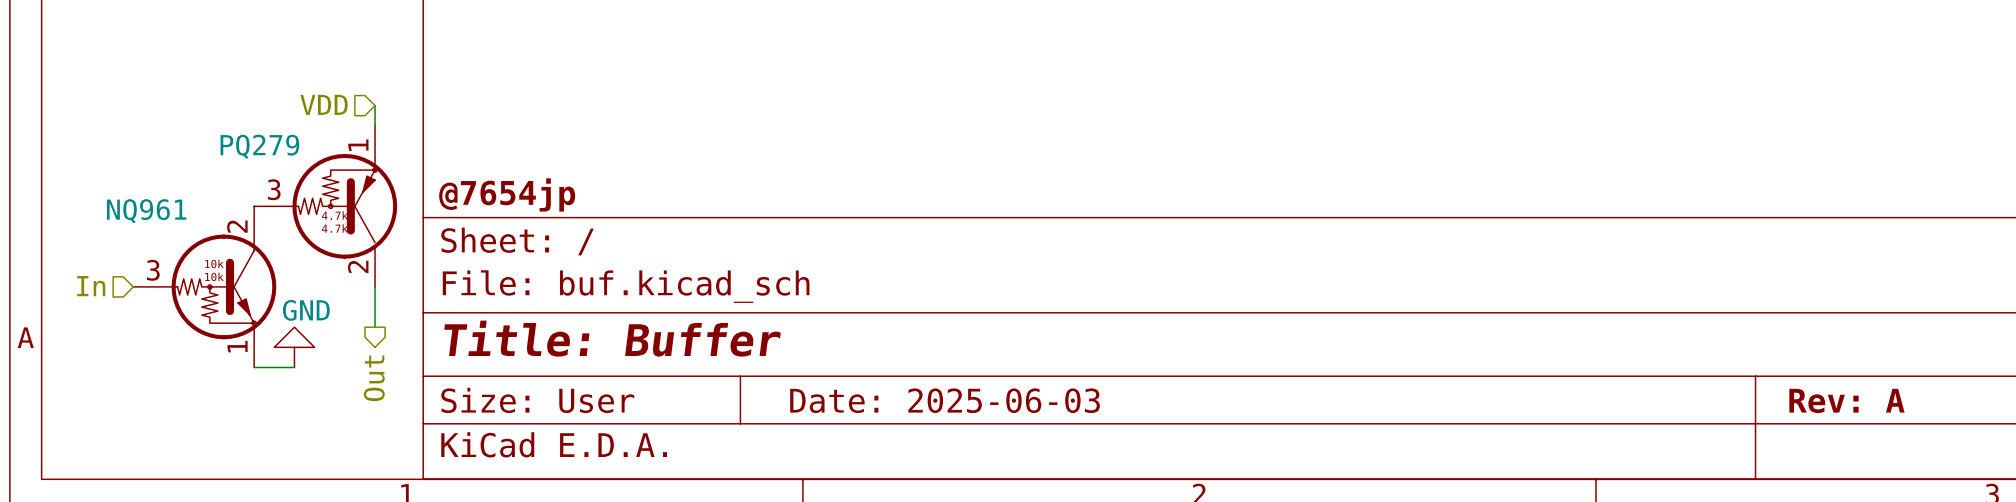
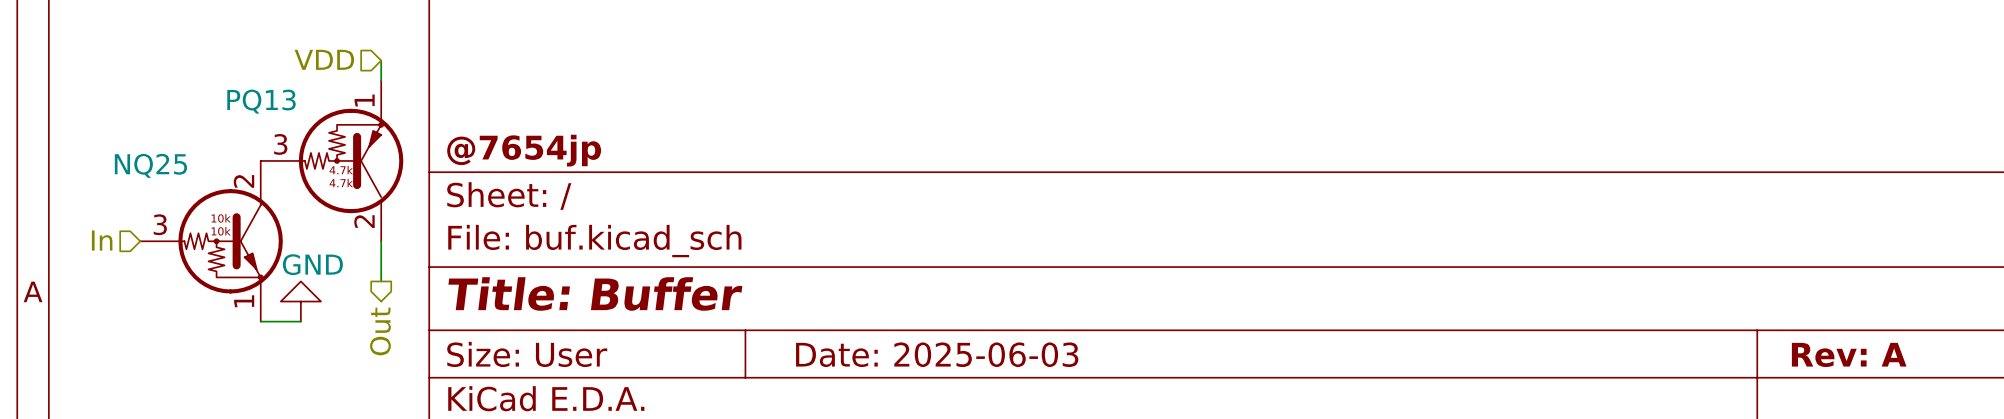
PQ279 name: PQ279 (259, 146) -> PQ13 (261, 101)
NQ961 name: NQ961 (146, 211) -> NQ25 (150, 165)

